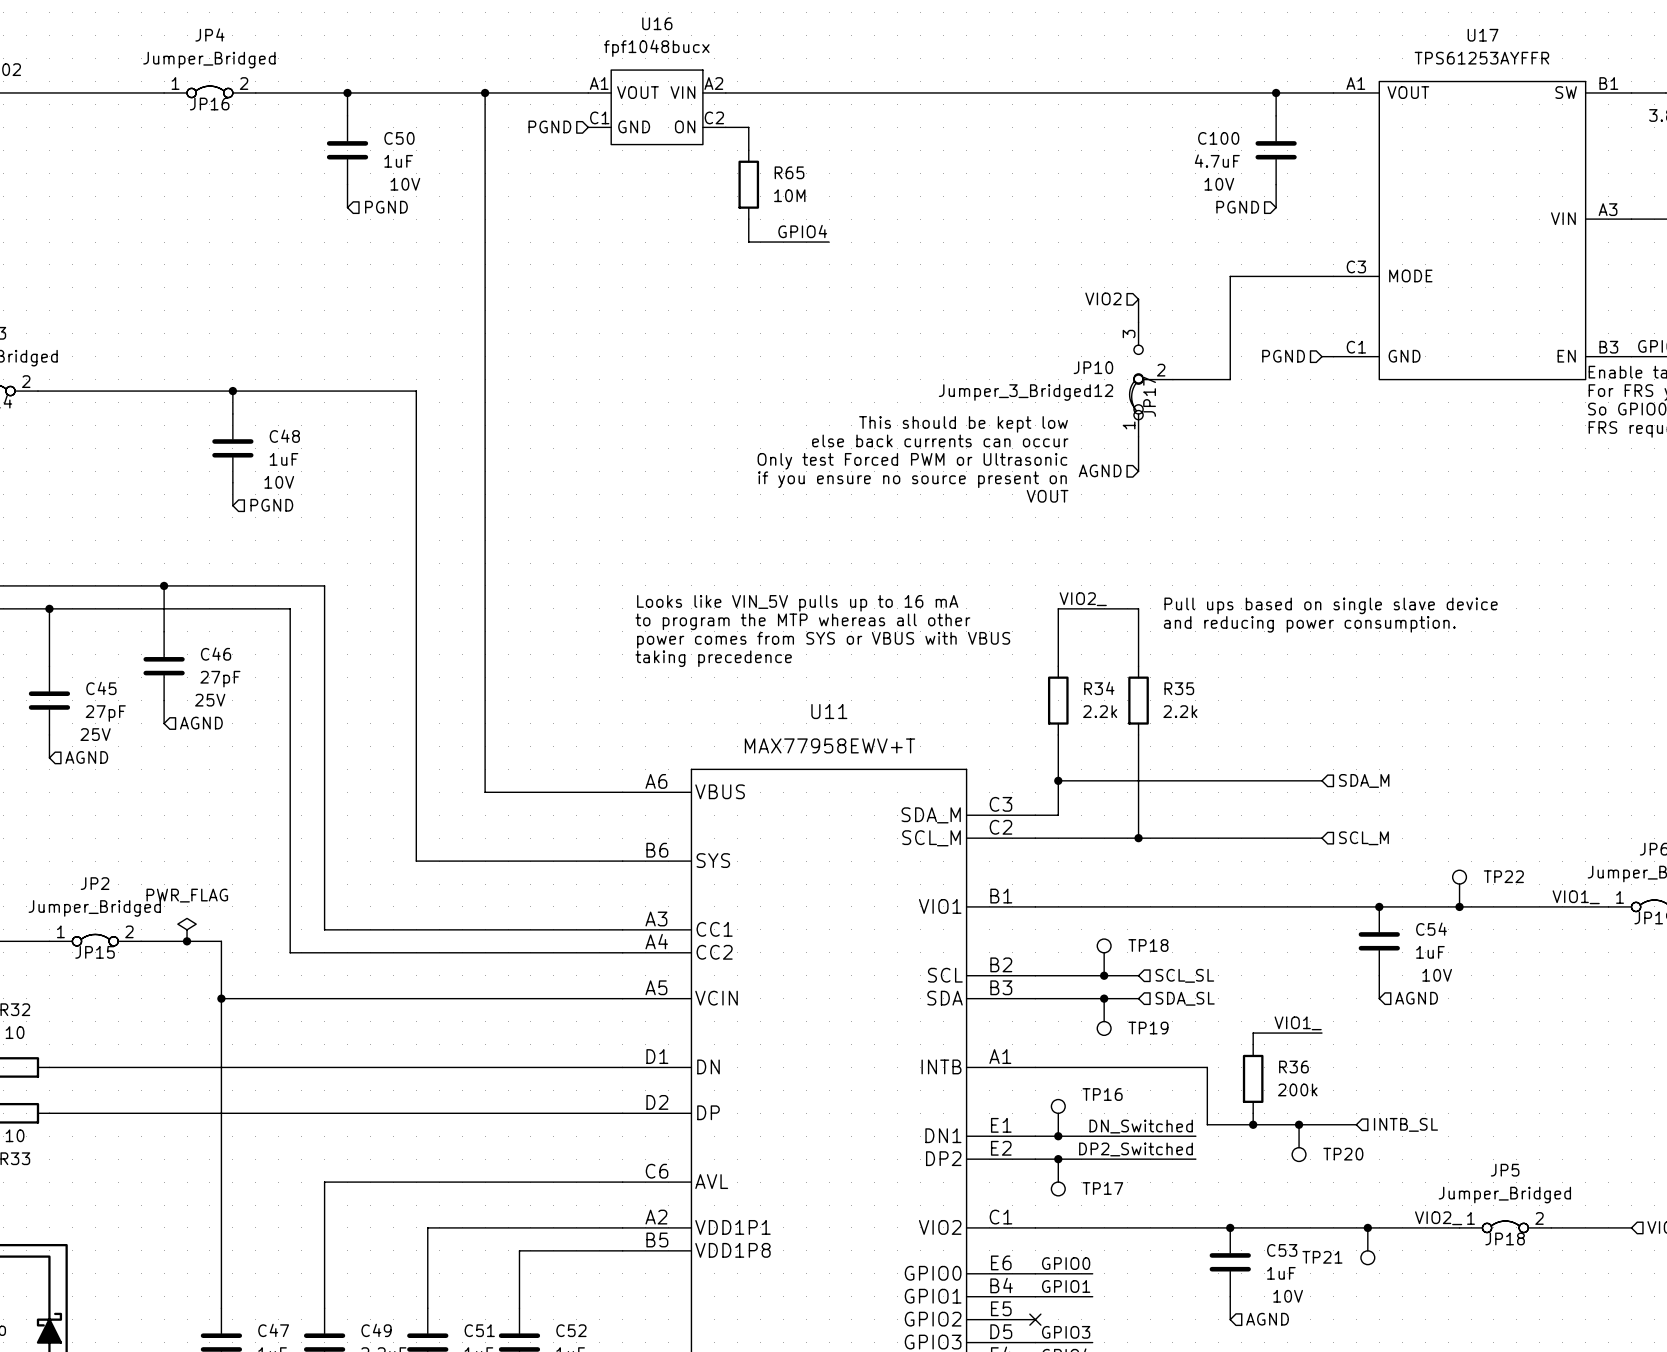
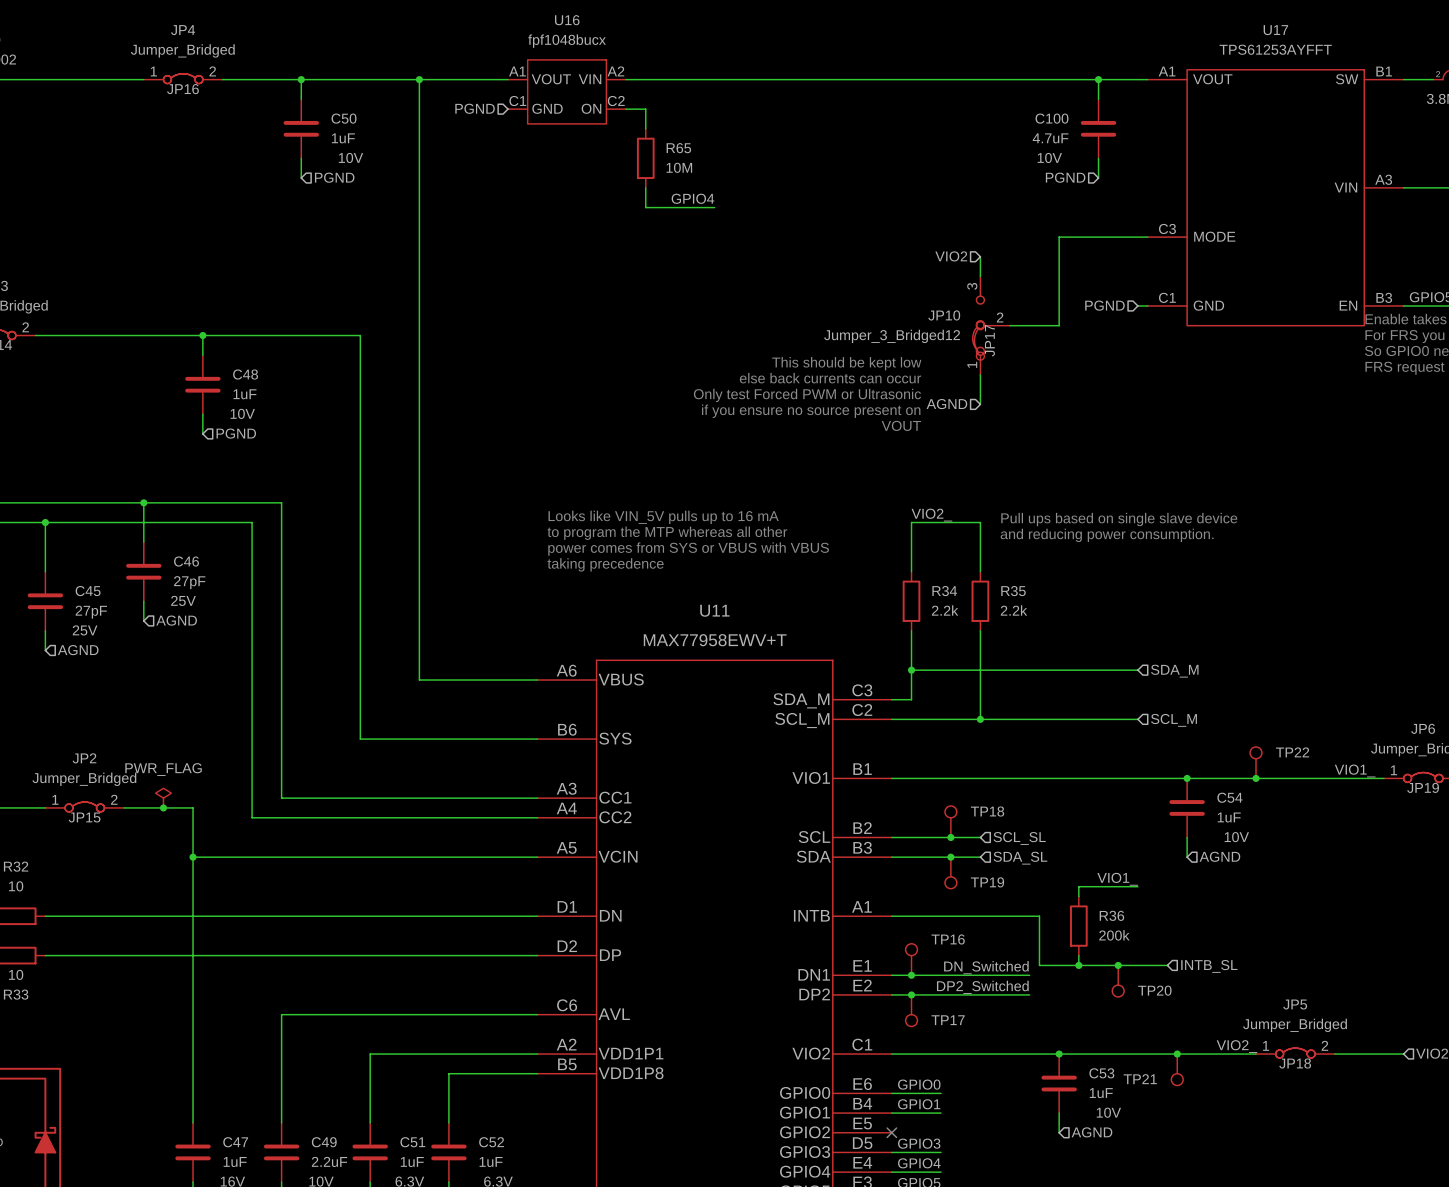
U17 value: TPS61253AYFFR (1481, 58) -> TPS61253AYFFT (1275, 49)

